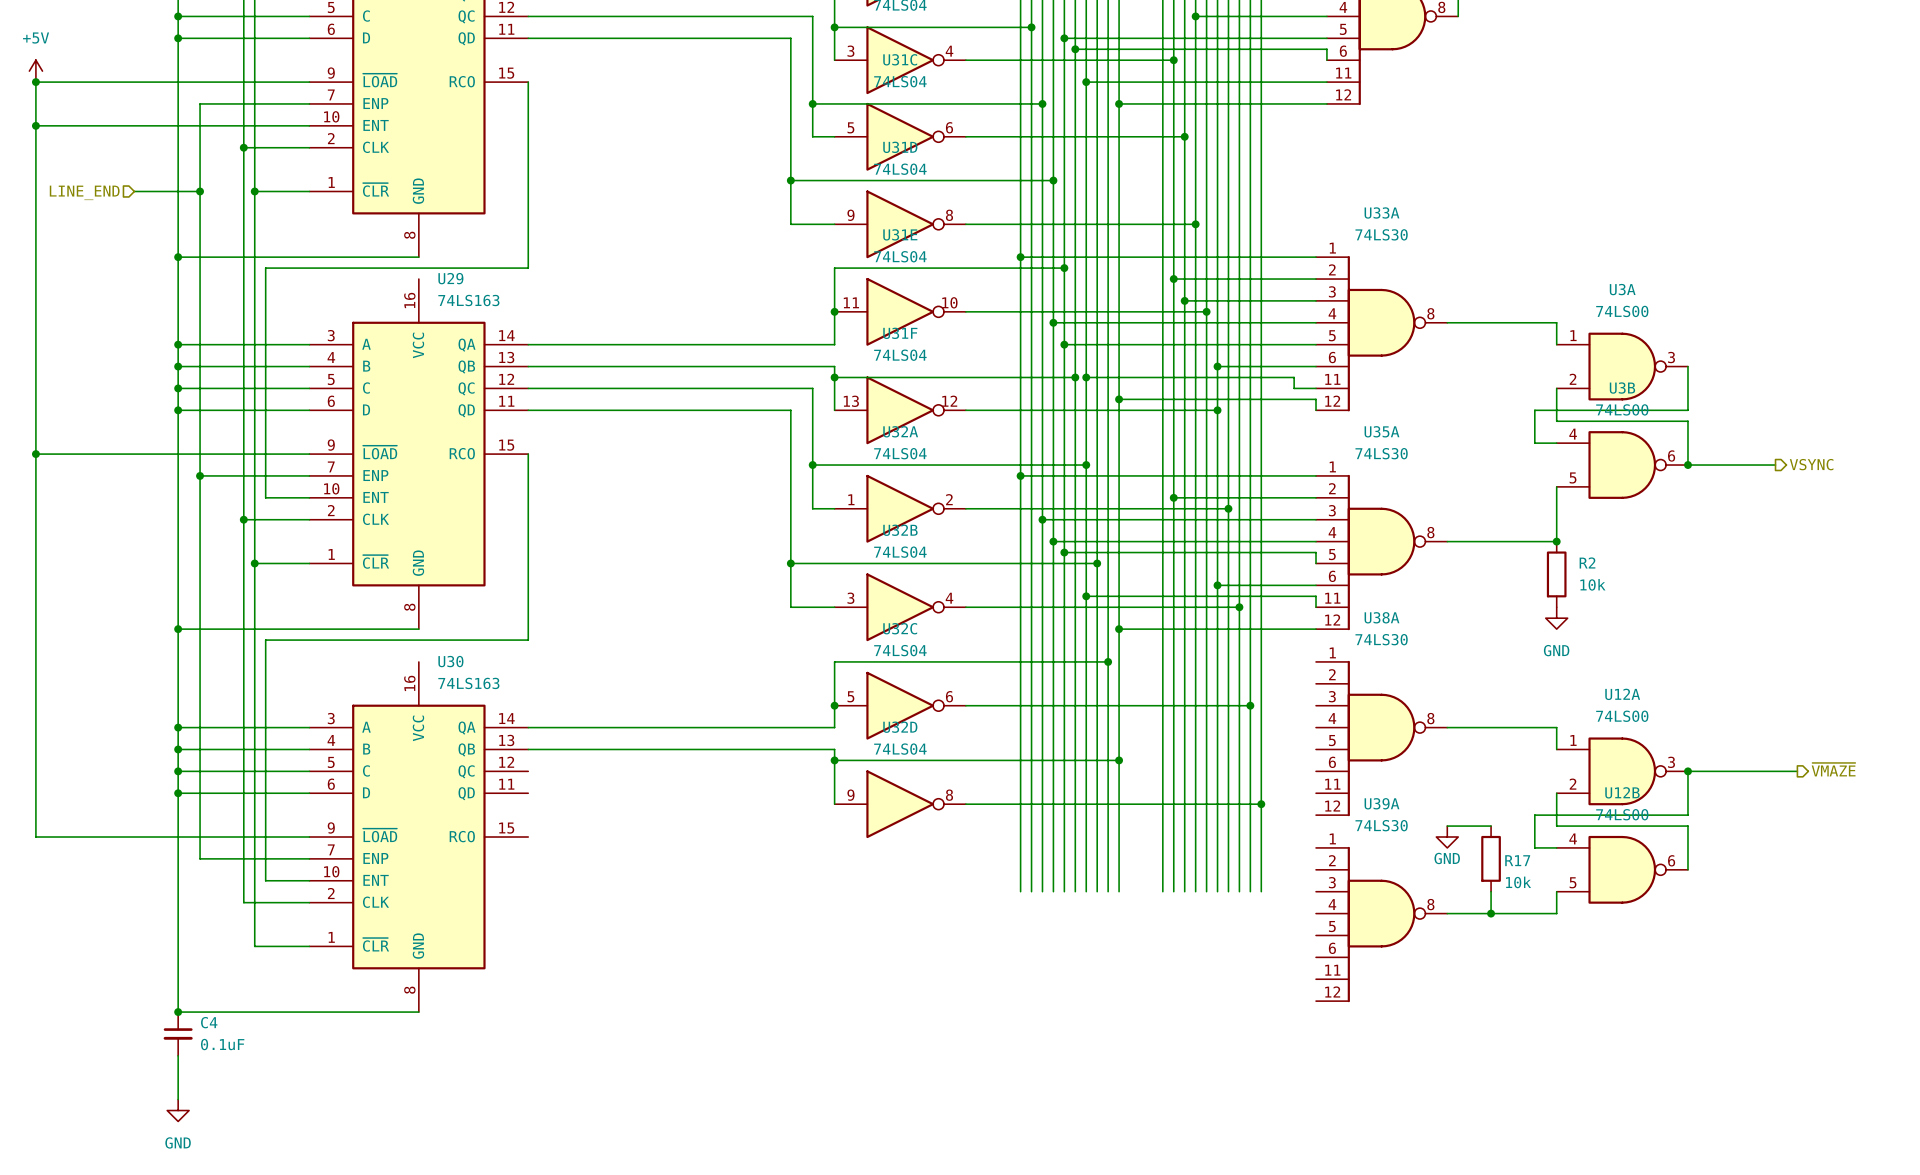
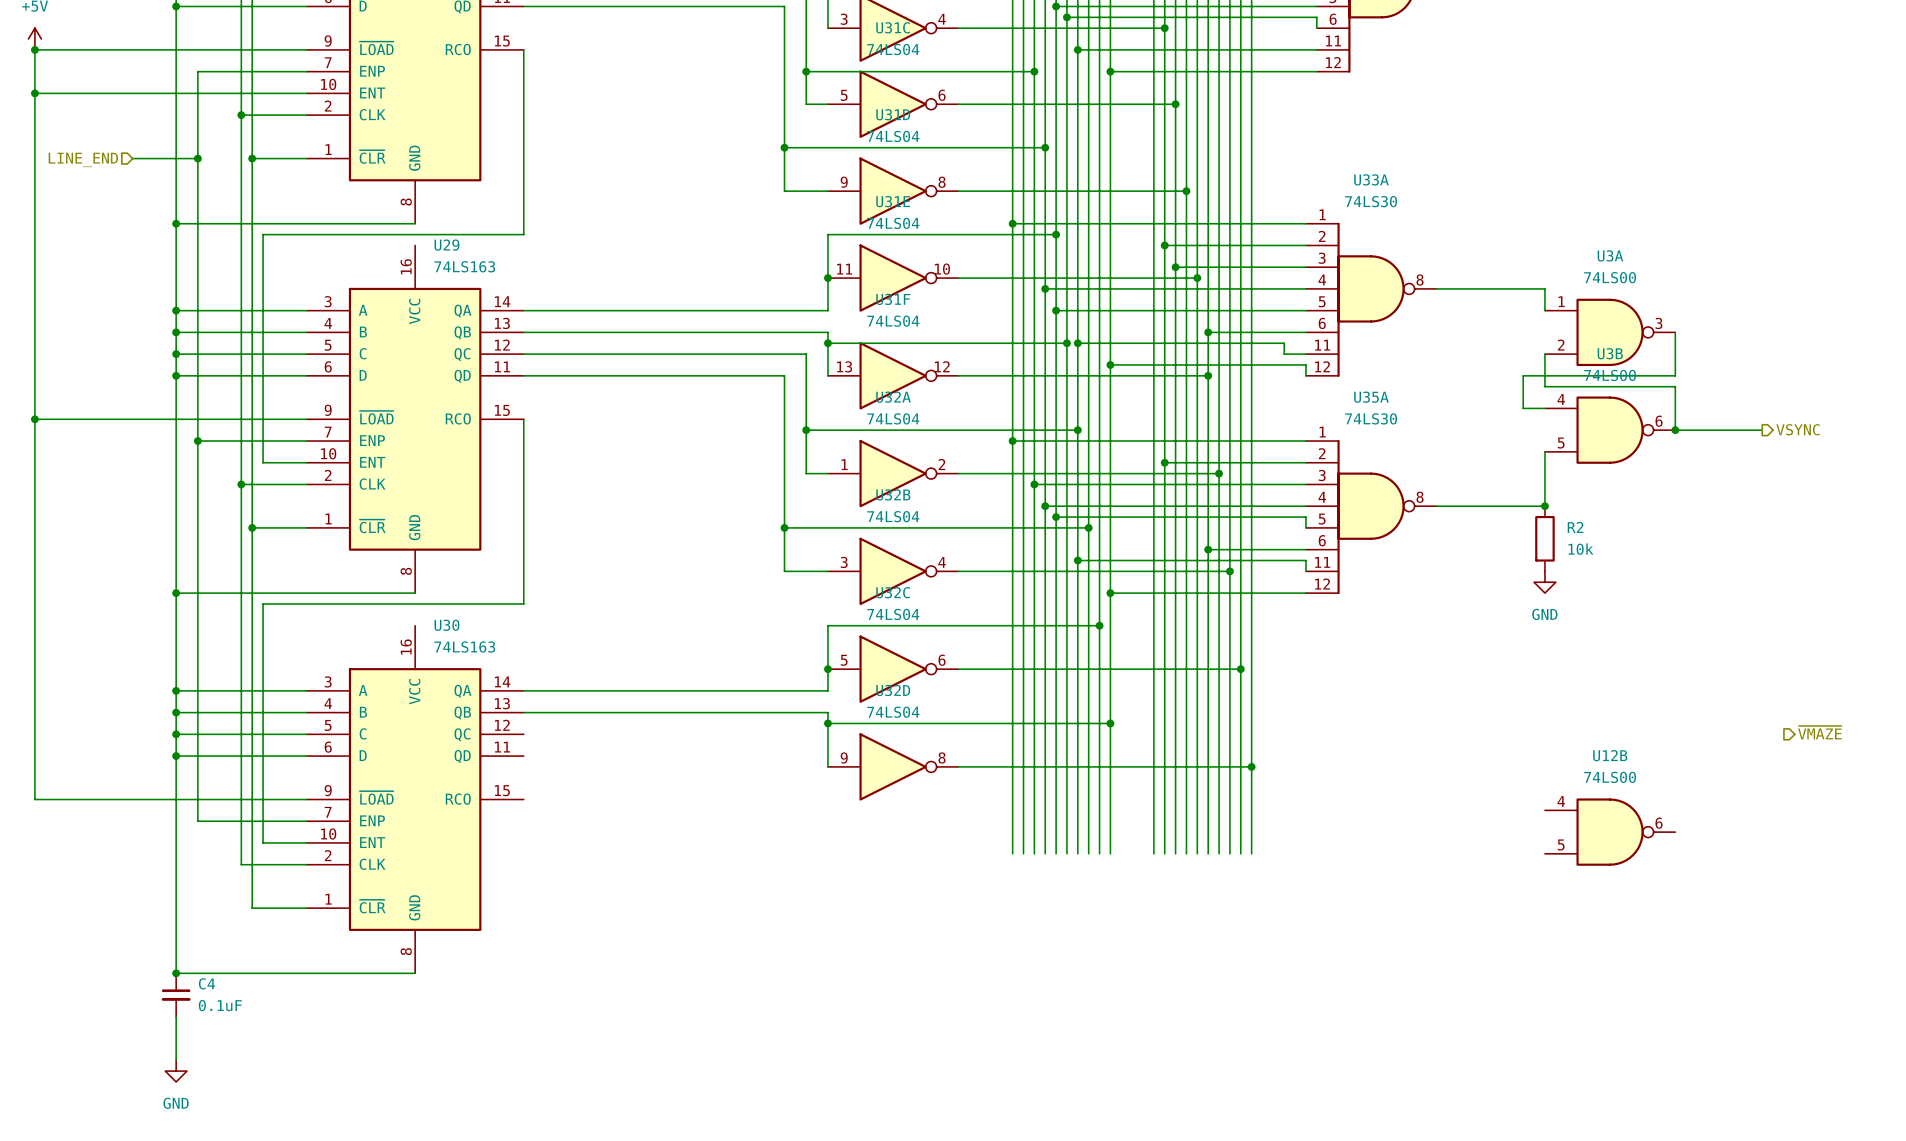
wire: (1447, 727) (1556, 727) (1556, 749) -> none
U38A: 74LS30 (1381, 738) -> none
U12A: 74LS00 (1622, 771) -> none
junction: (1687, 771) -> none
wire: (1797, 771) (1687, 771) (1687, 815) (1534, 815) (1534, 847) (1556, 847) -> none
wire: (1556, 793) (1556, 826) (1687, 826) (1687, 869) -> none
wire: (1447, 826) (1491, 826) -> none
power symbol: GND (1447, 837) -> none
R17: 10k (1491, 858) -> none
wire: (1491, 891) (1491, 913) -> none
wire: (1556, 891) (1556, 913) (1447, 913) -> none
junction: (1491, 913) -> none
U39A: 74LS30 (1381, 924) -> none

